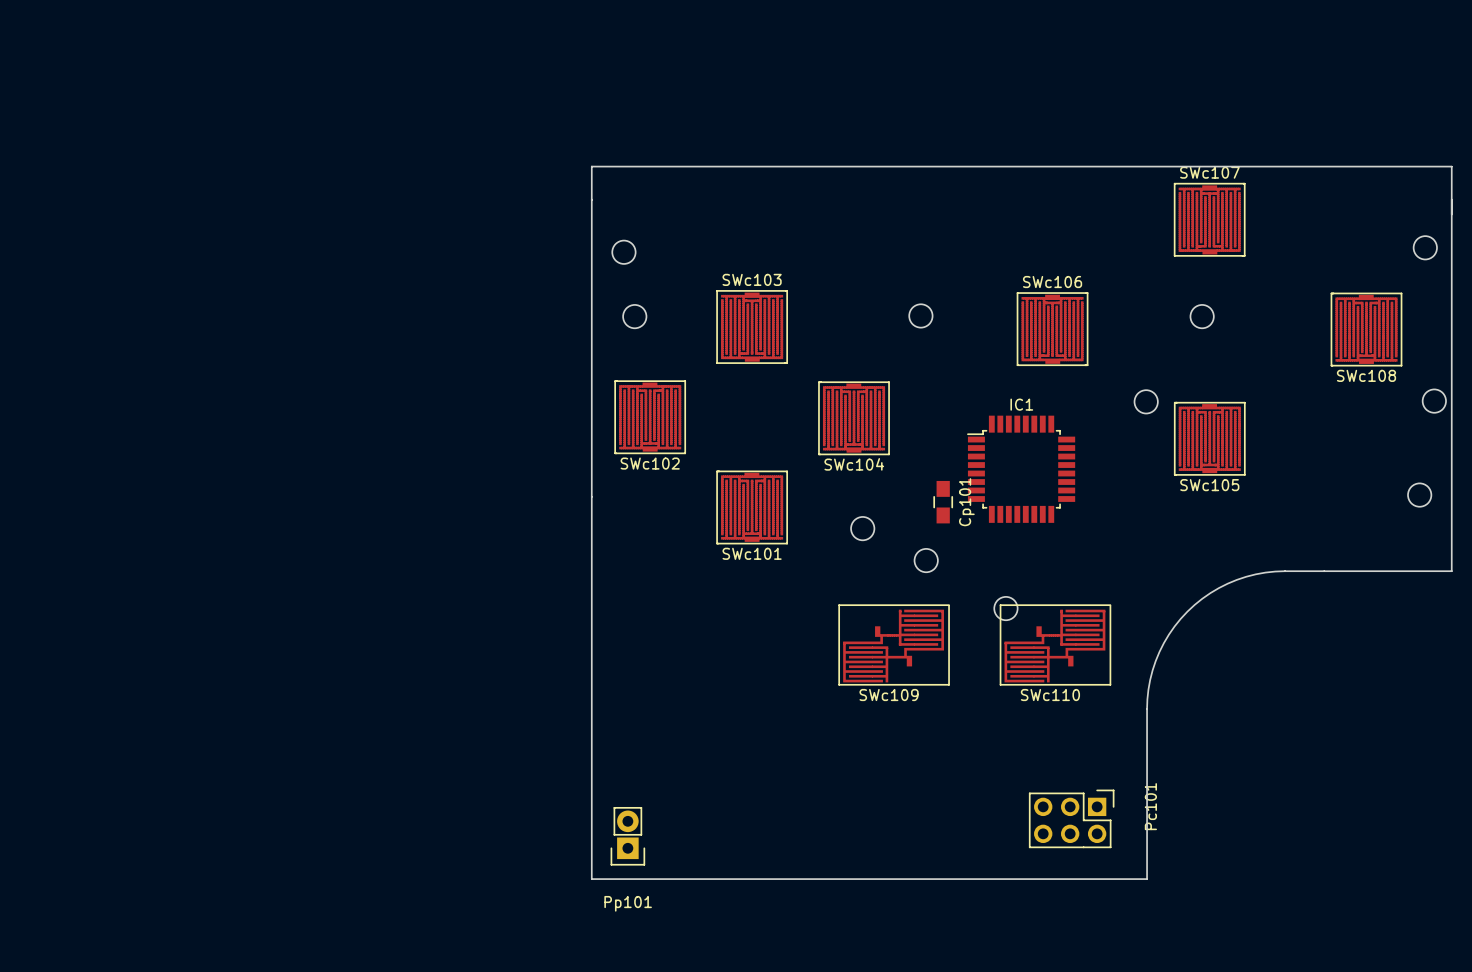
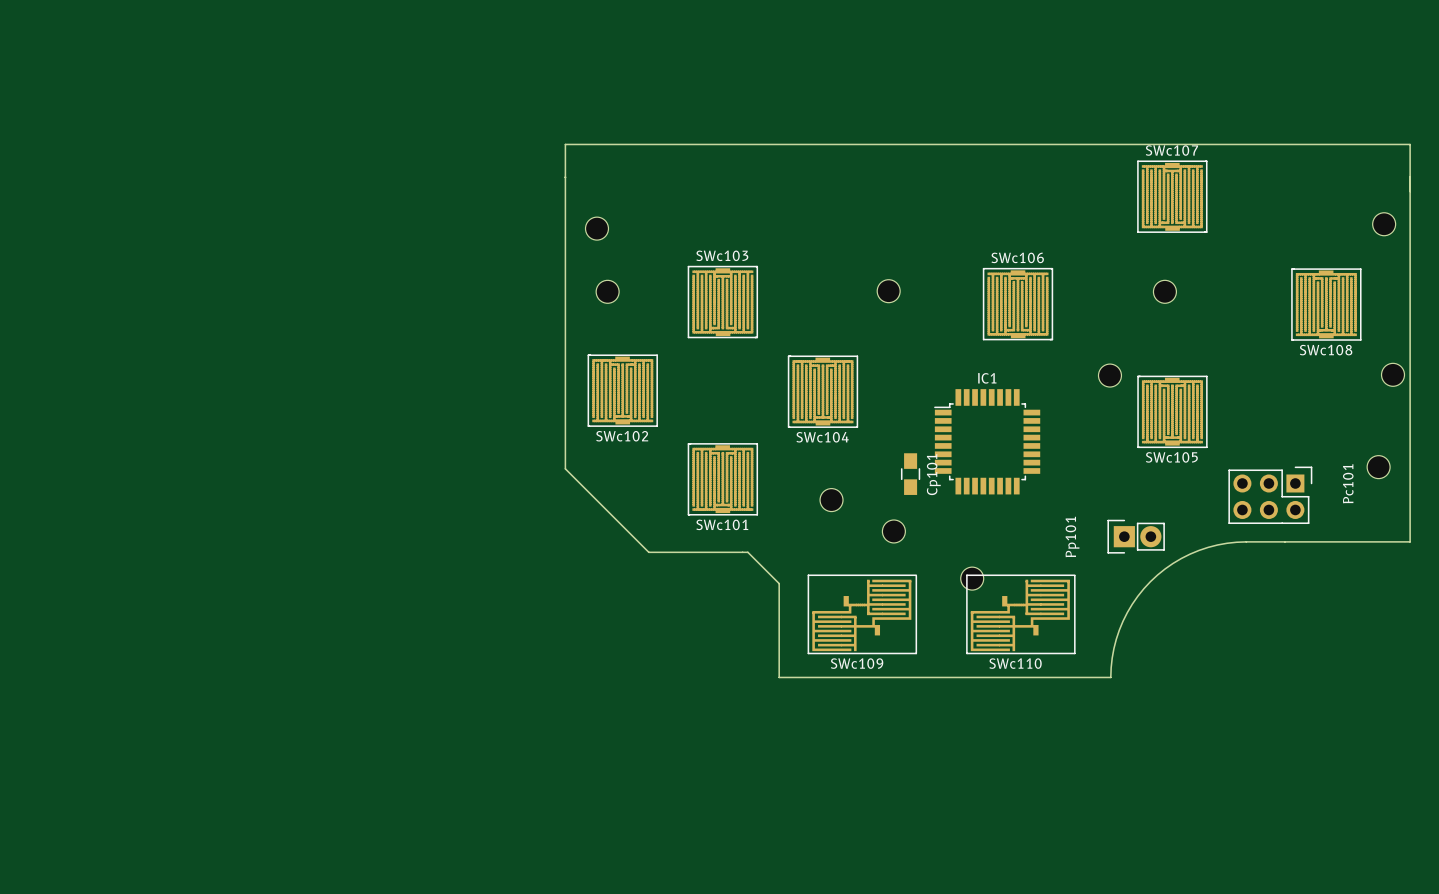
board edge: (591, 496) (591, 879) (1147, 879) (1147, 709) -> (565, 468) (648, 552) (747, 552) (779, 583) (779, 677) (1110, 677)
Pc101 position: (1071, 818) -> (1270, 495)
Pp101 rotation: 0° (627, 836) -> 90° clockwise (1136, 536)
Pp101 position: (627, 836) -> (1136, 536)

